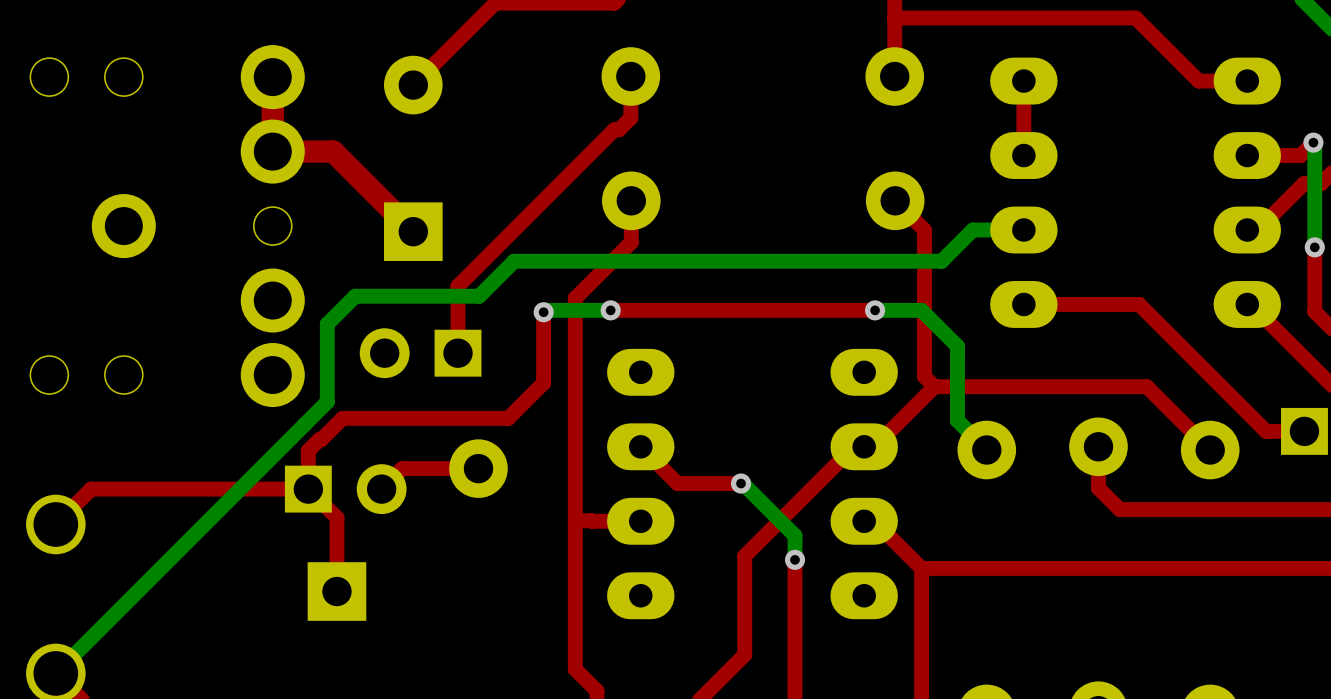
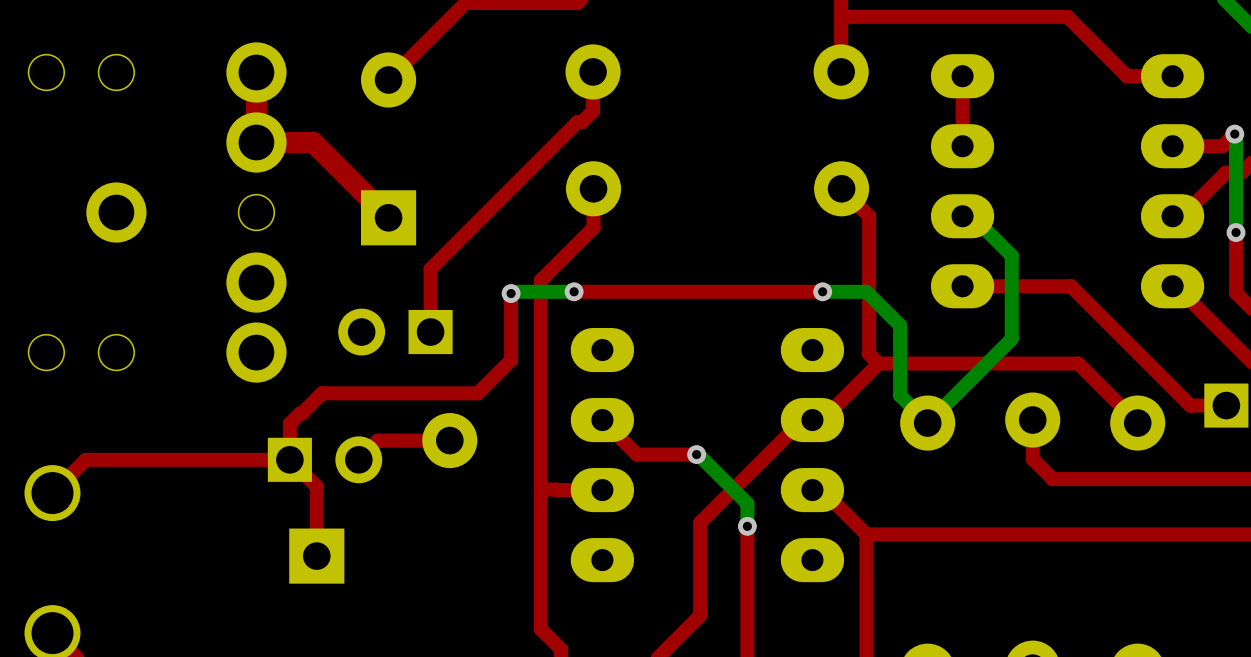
bottom track: (1023, 230) (972, 230) (941, 261) (514, 261) (479, 296) (355, 296) (327, 324) (327, 401) (55, 673) -> none
bottom track: none -> (972, 216) (1011, 255) (1011, 339) (927, 423)

